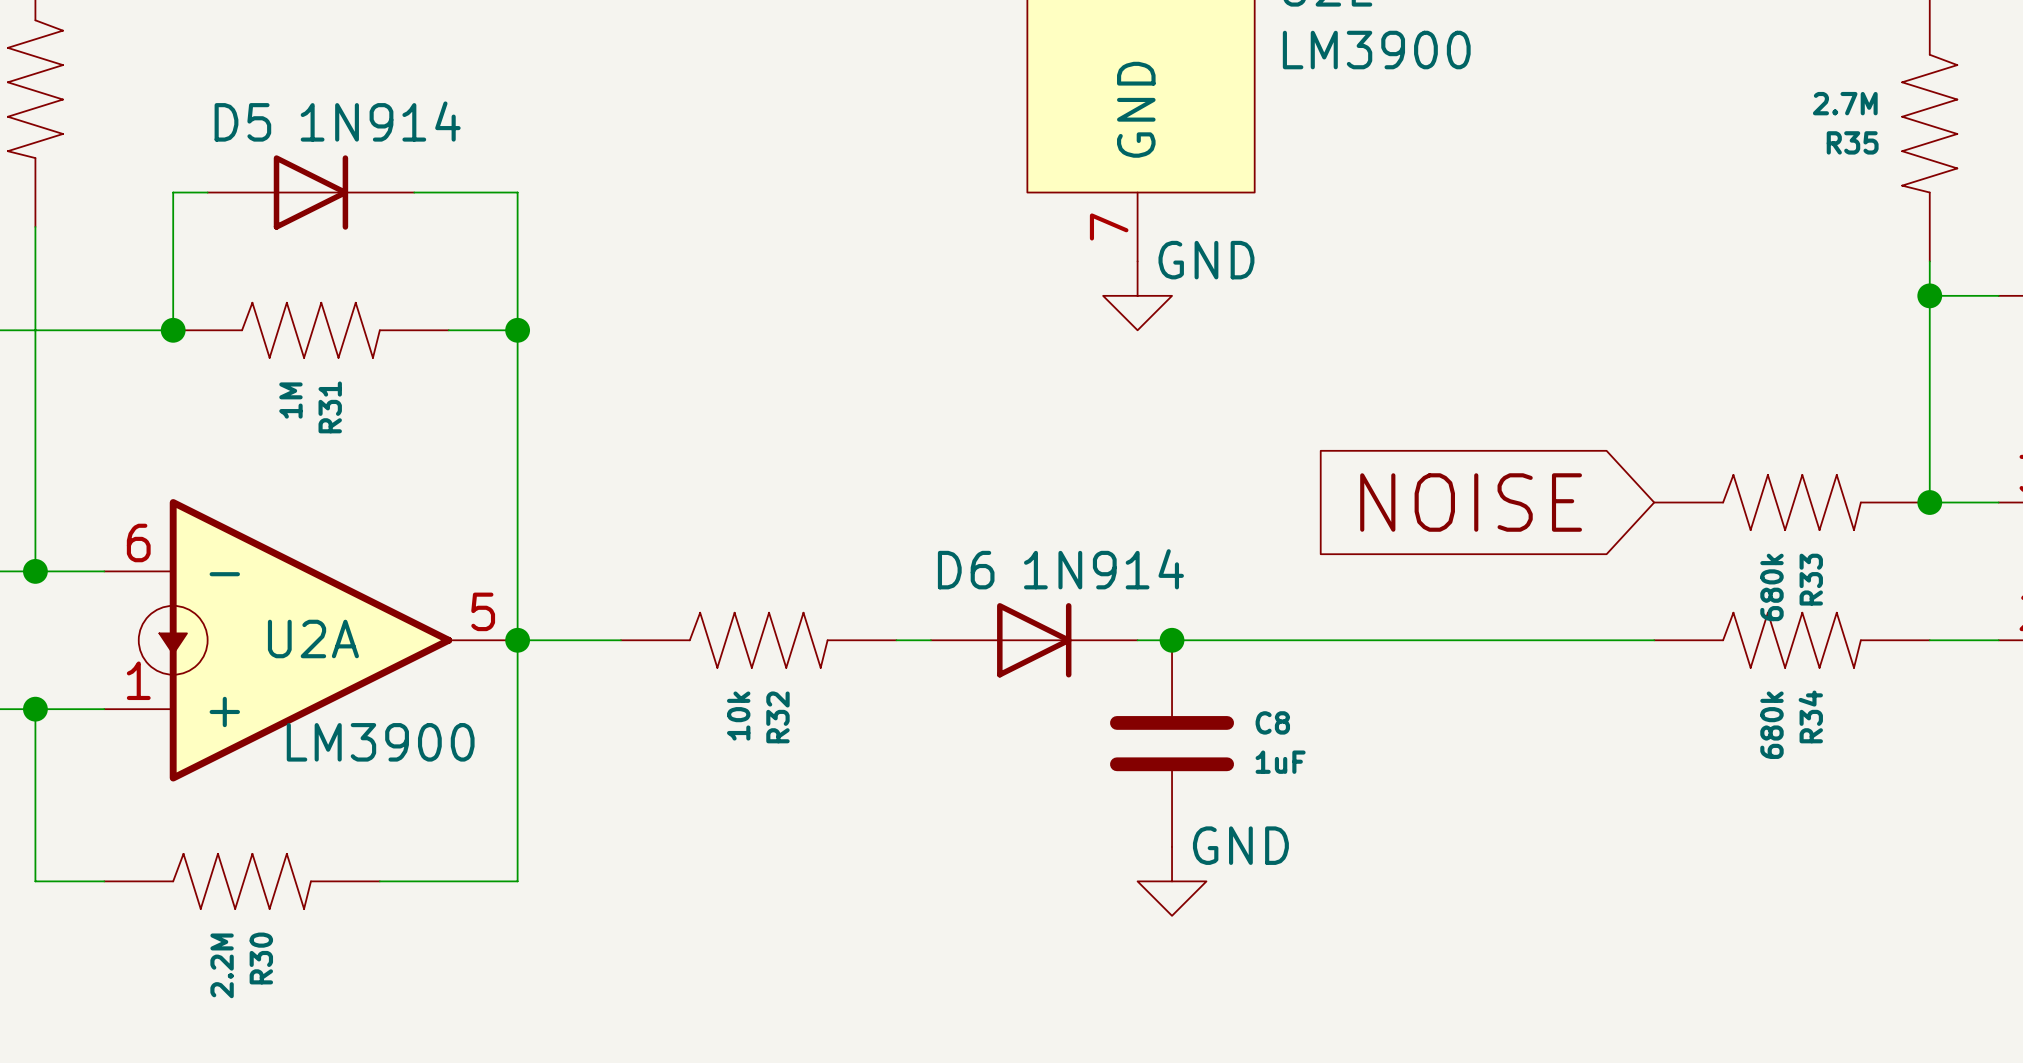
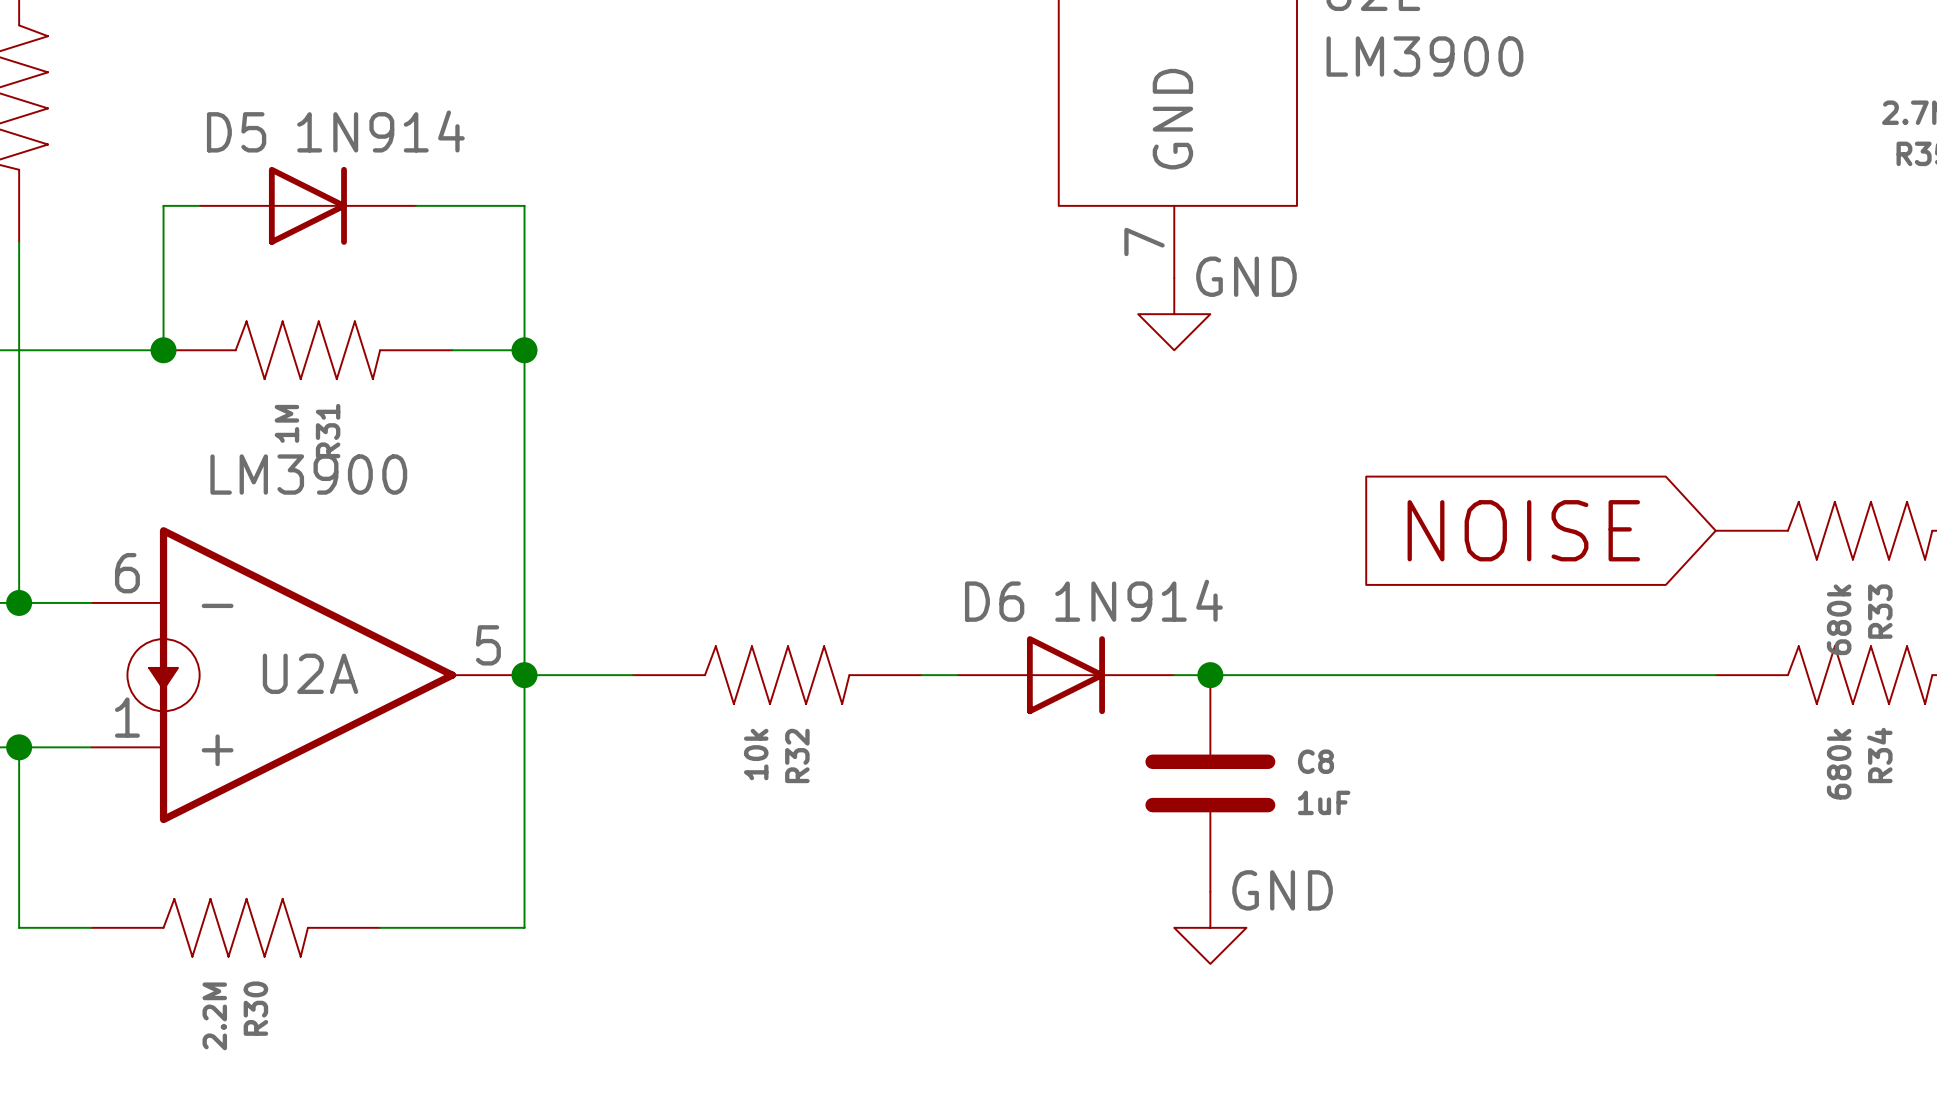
U2A value position: LM3900 (380, 742) -> LM3900 (308, 474)

